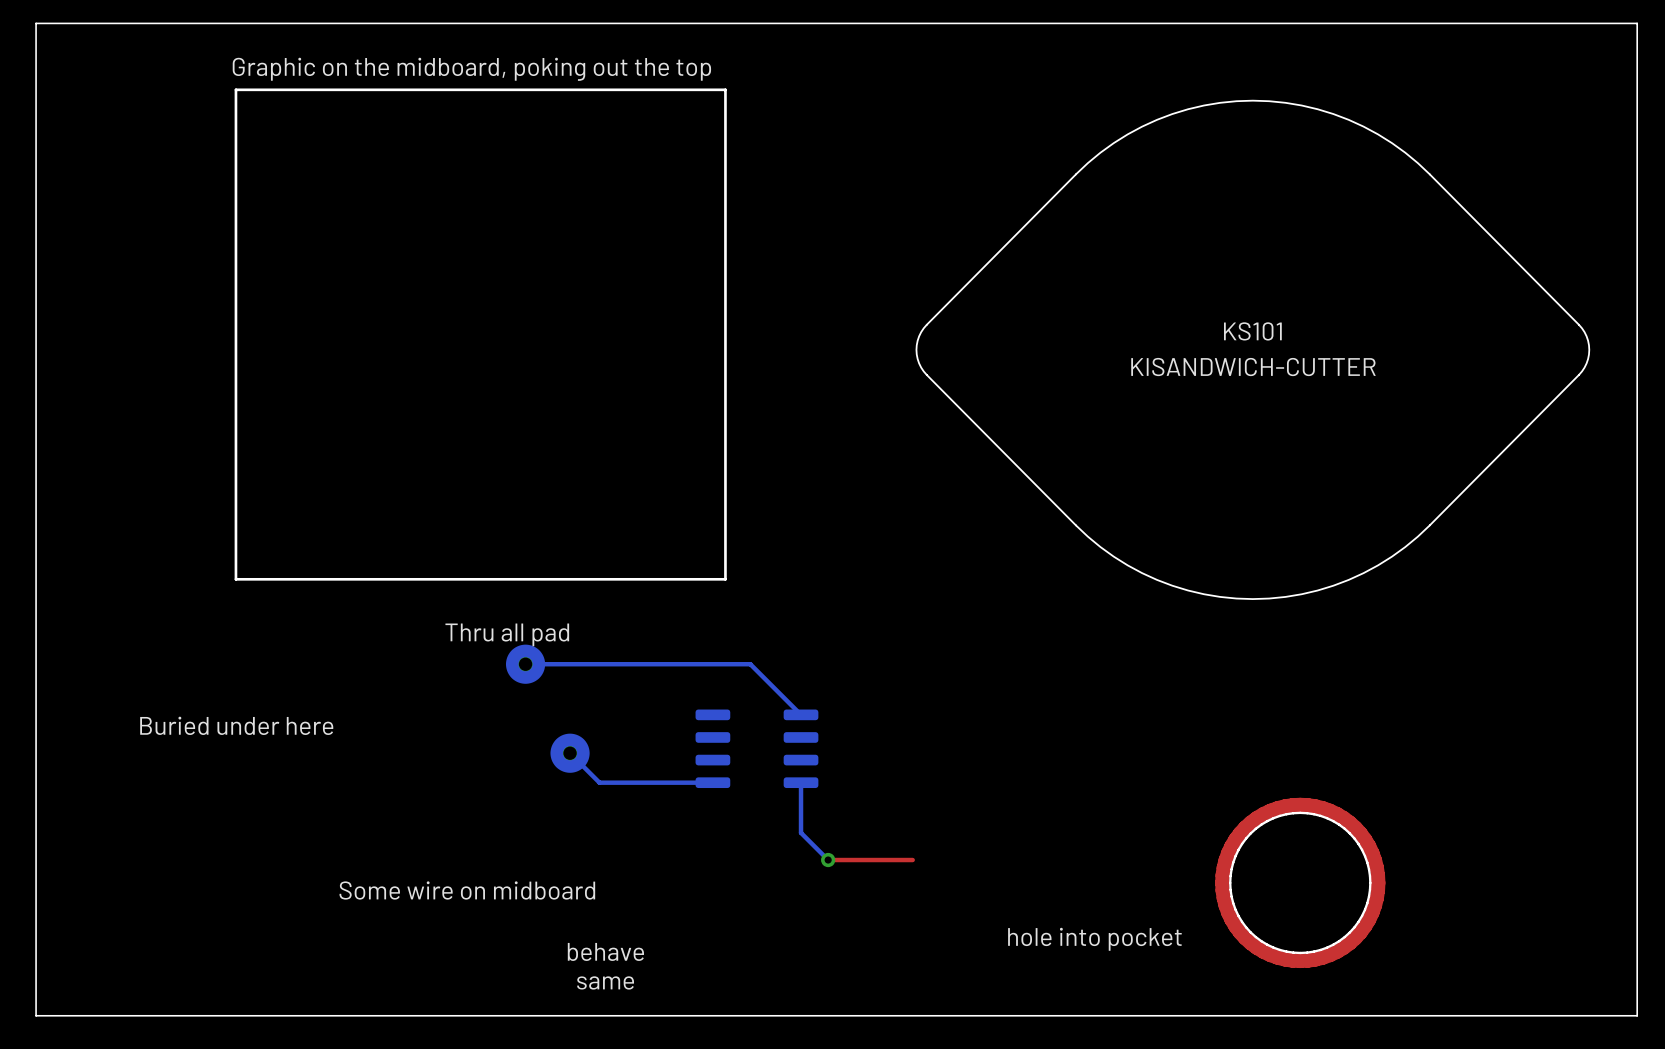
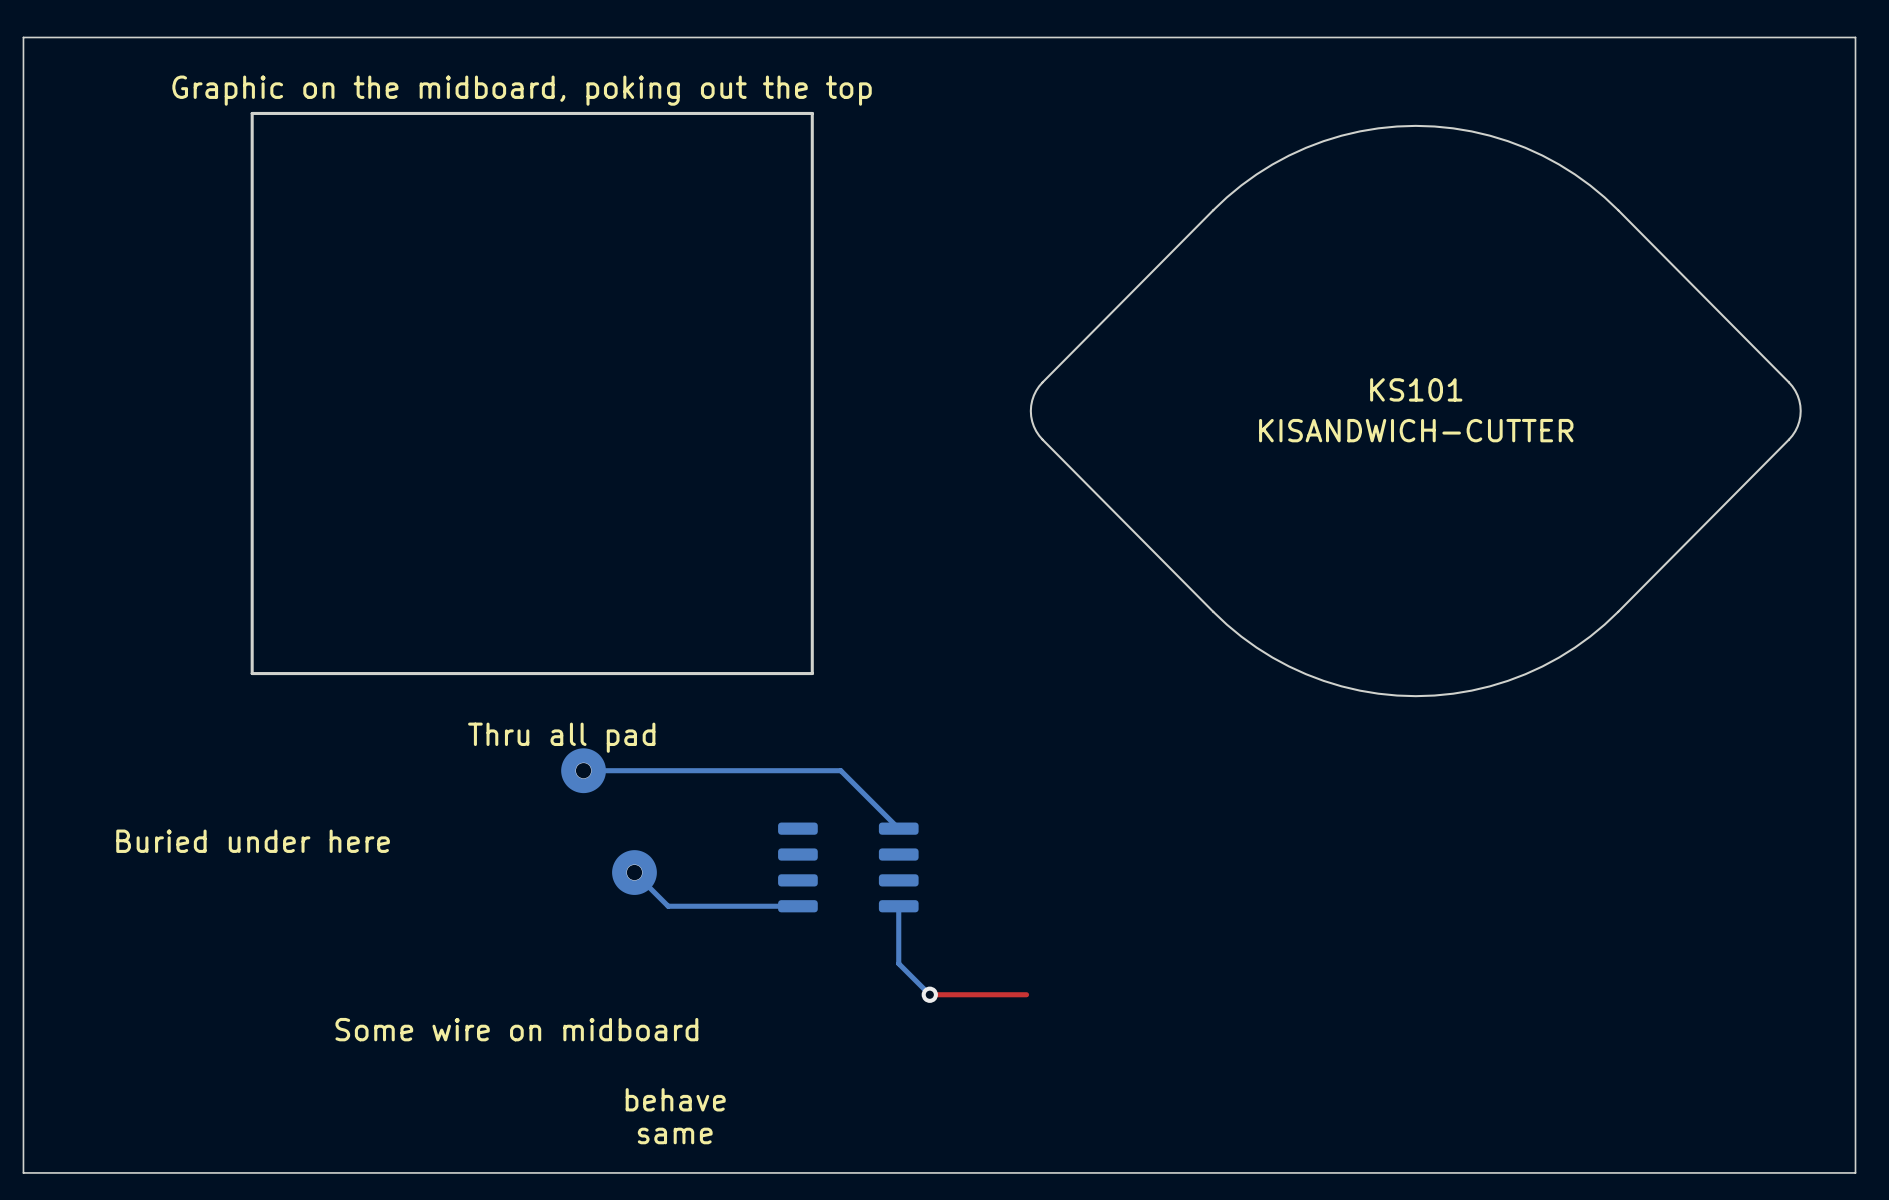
drawing: [1215, 797, 1386, 969] -> none
text: hole into pocket (1094, 939) -> none

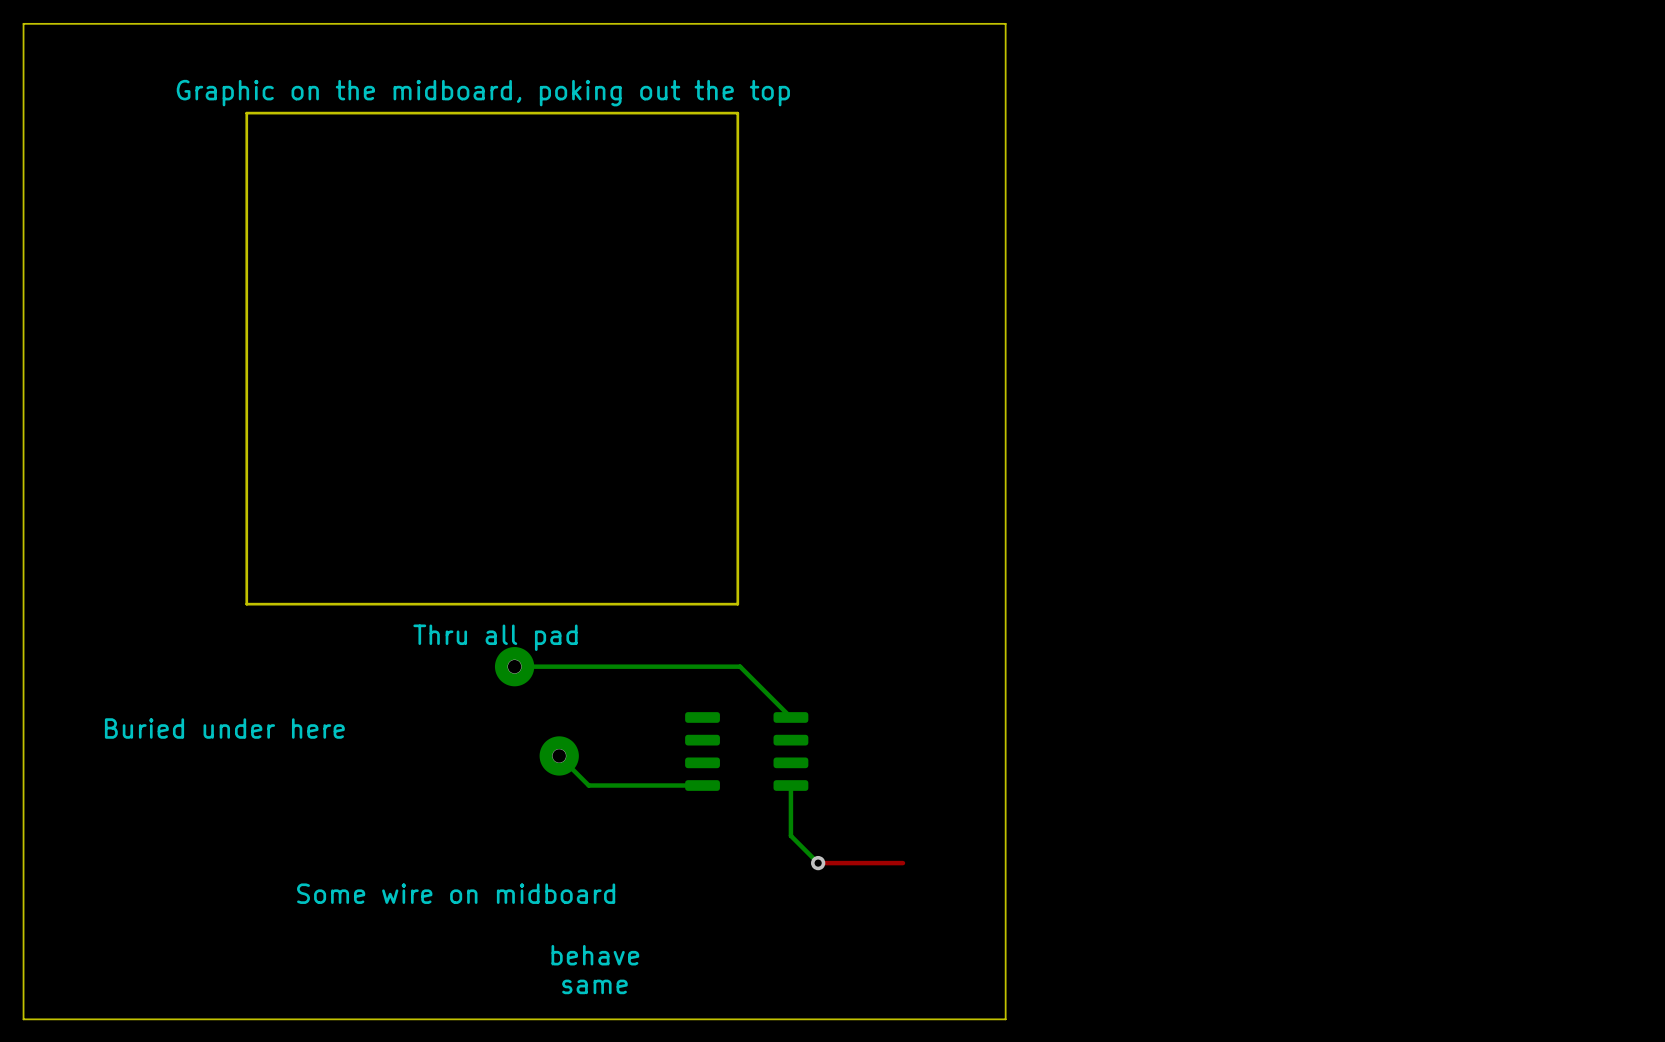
board edge: (1143, 37) (1855, 37) (1855, 1172) (1143, 1172) -> (1005, 23) (1005, 1019)
text position: Graphic on the midboard, poking out the top (522, 90) -> Graphic on the midboard, poking out the top (483, 93)
board edge: (252, 113) (252, 673) (812, 673) (812, 113) (252, 113) -> (246, 113) (246, 604) (737, 604) (737, 113) (246, 113)
KS101: KISANDWICH-CUTTER (1415, 411) -> none

